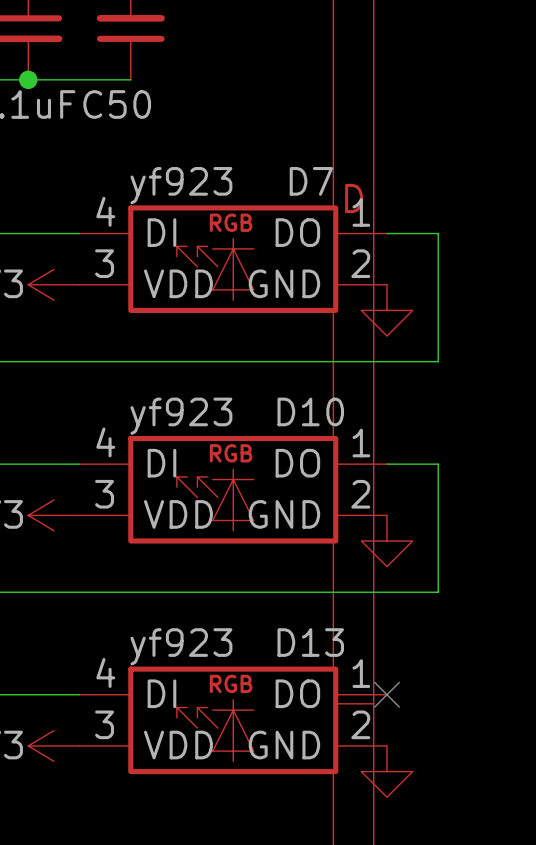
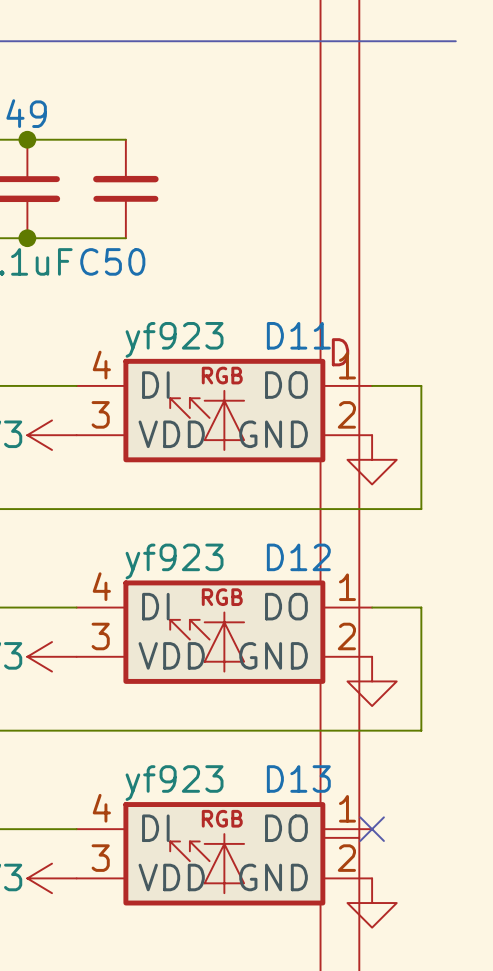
D7 name: D7 (311, 181) -> D11 (298, 335)
D10 name: D10 (310, 411) -> D12 (298, 557)

